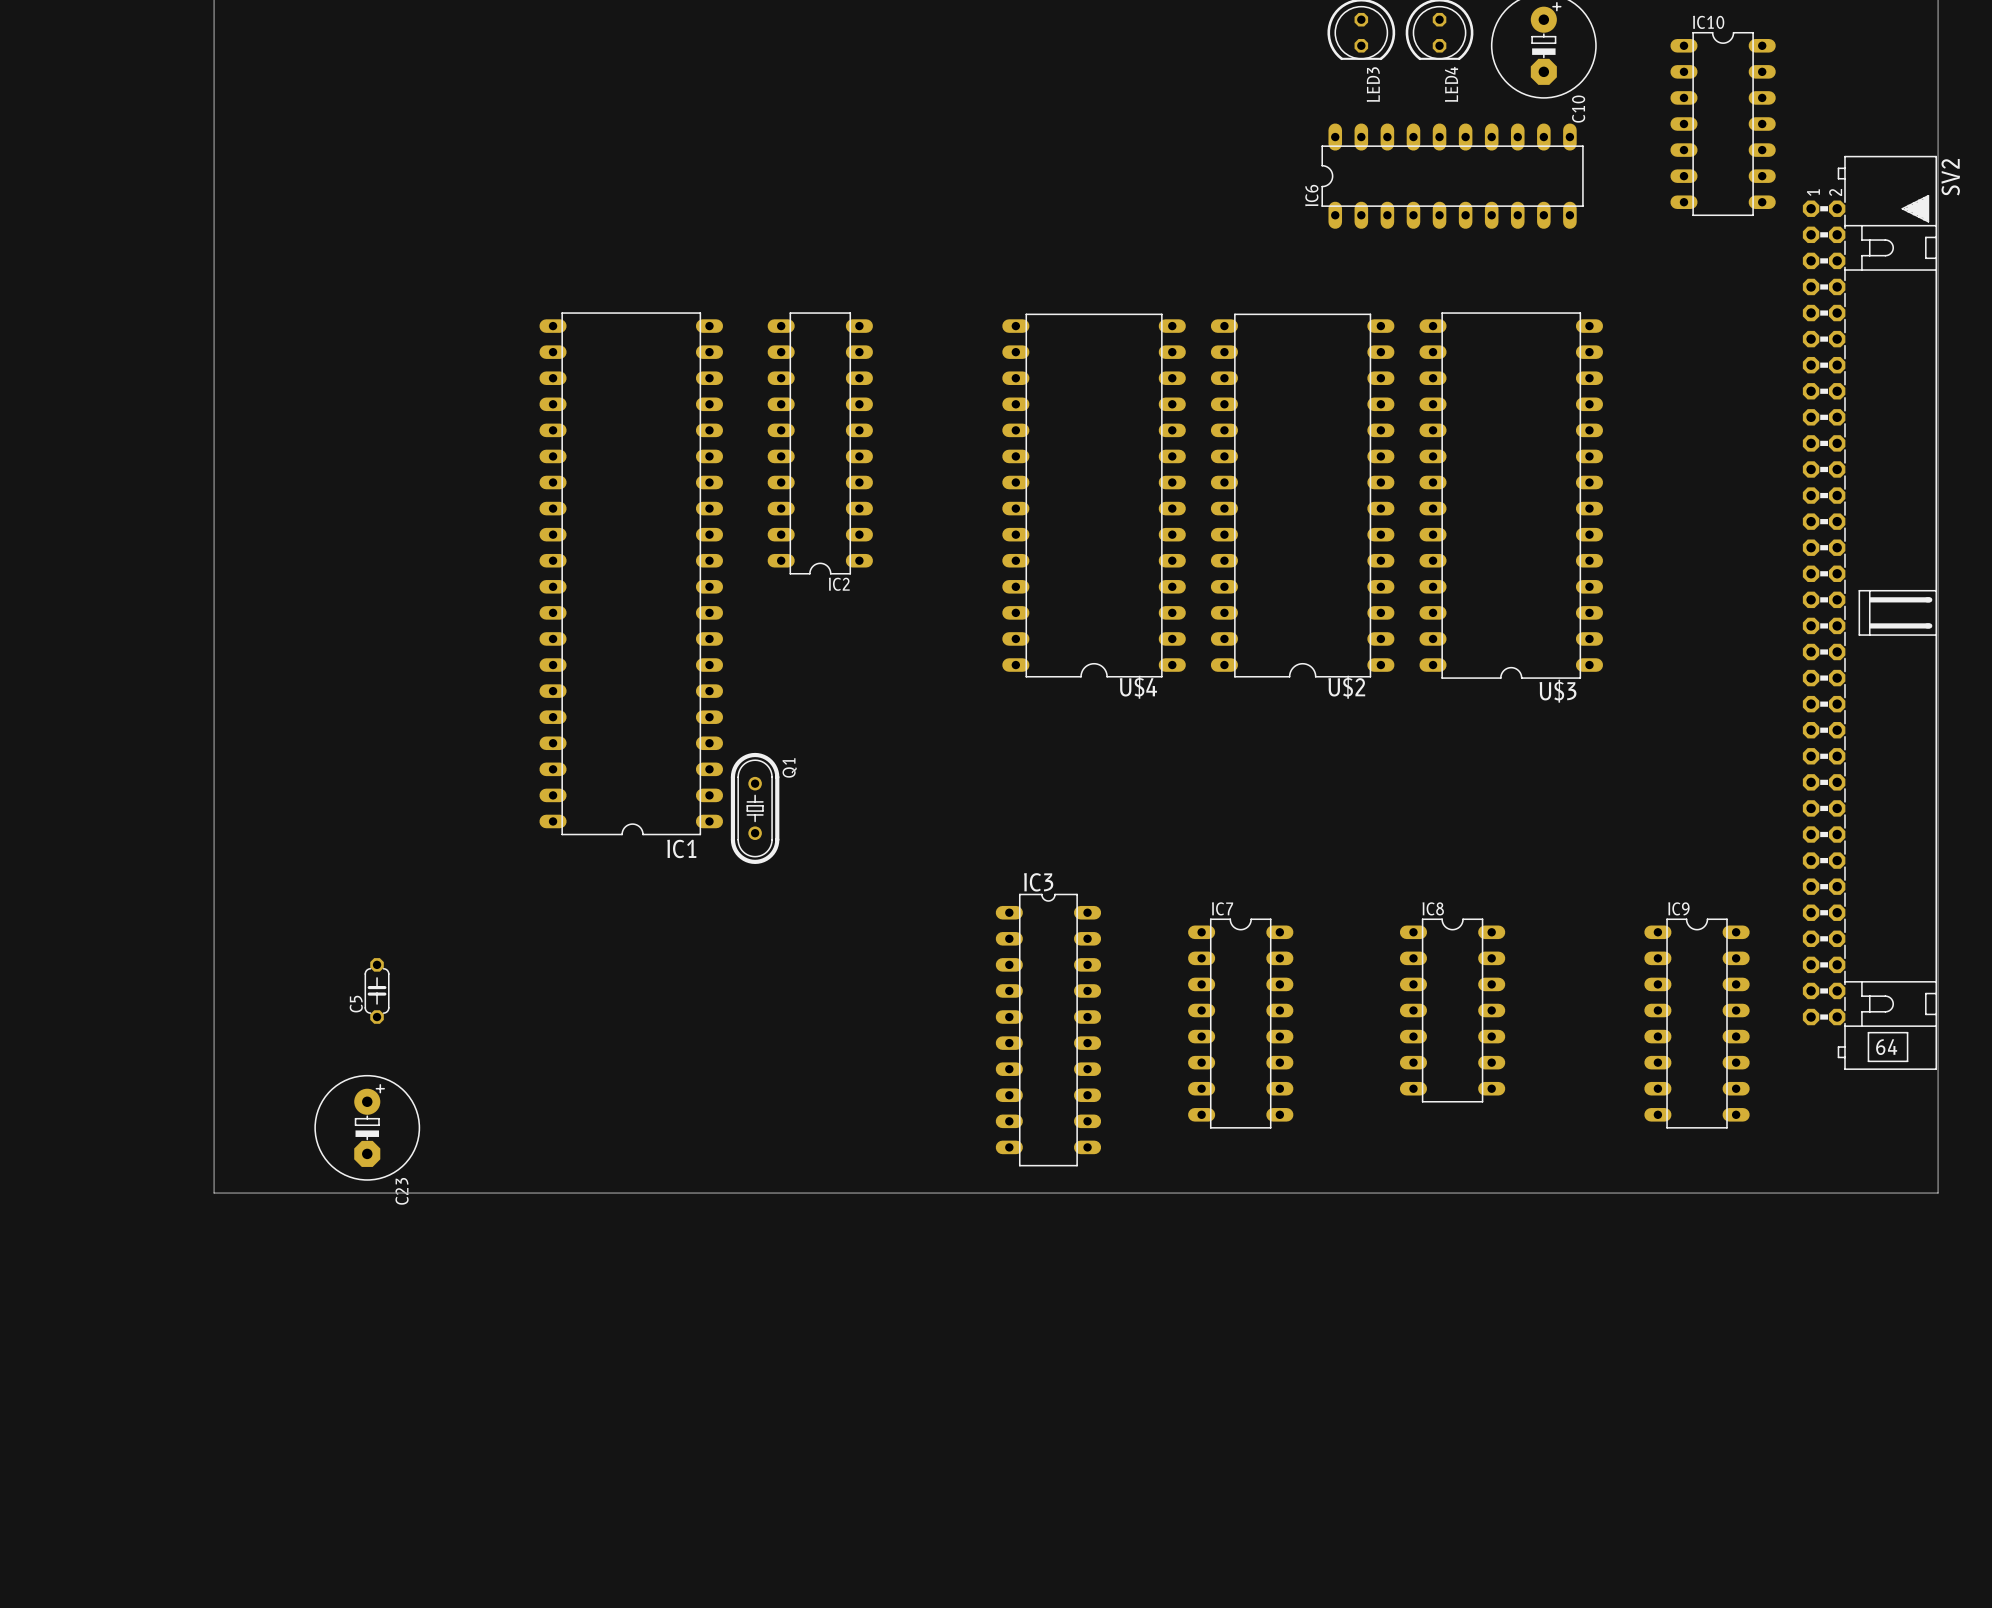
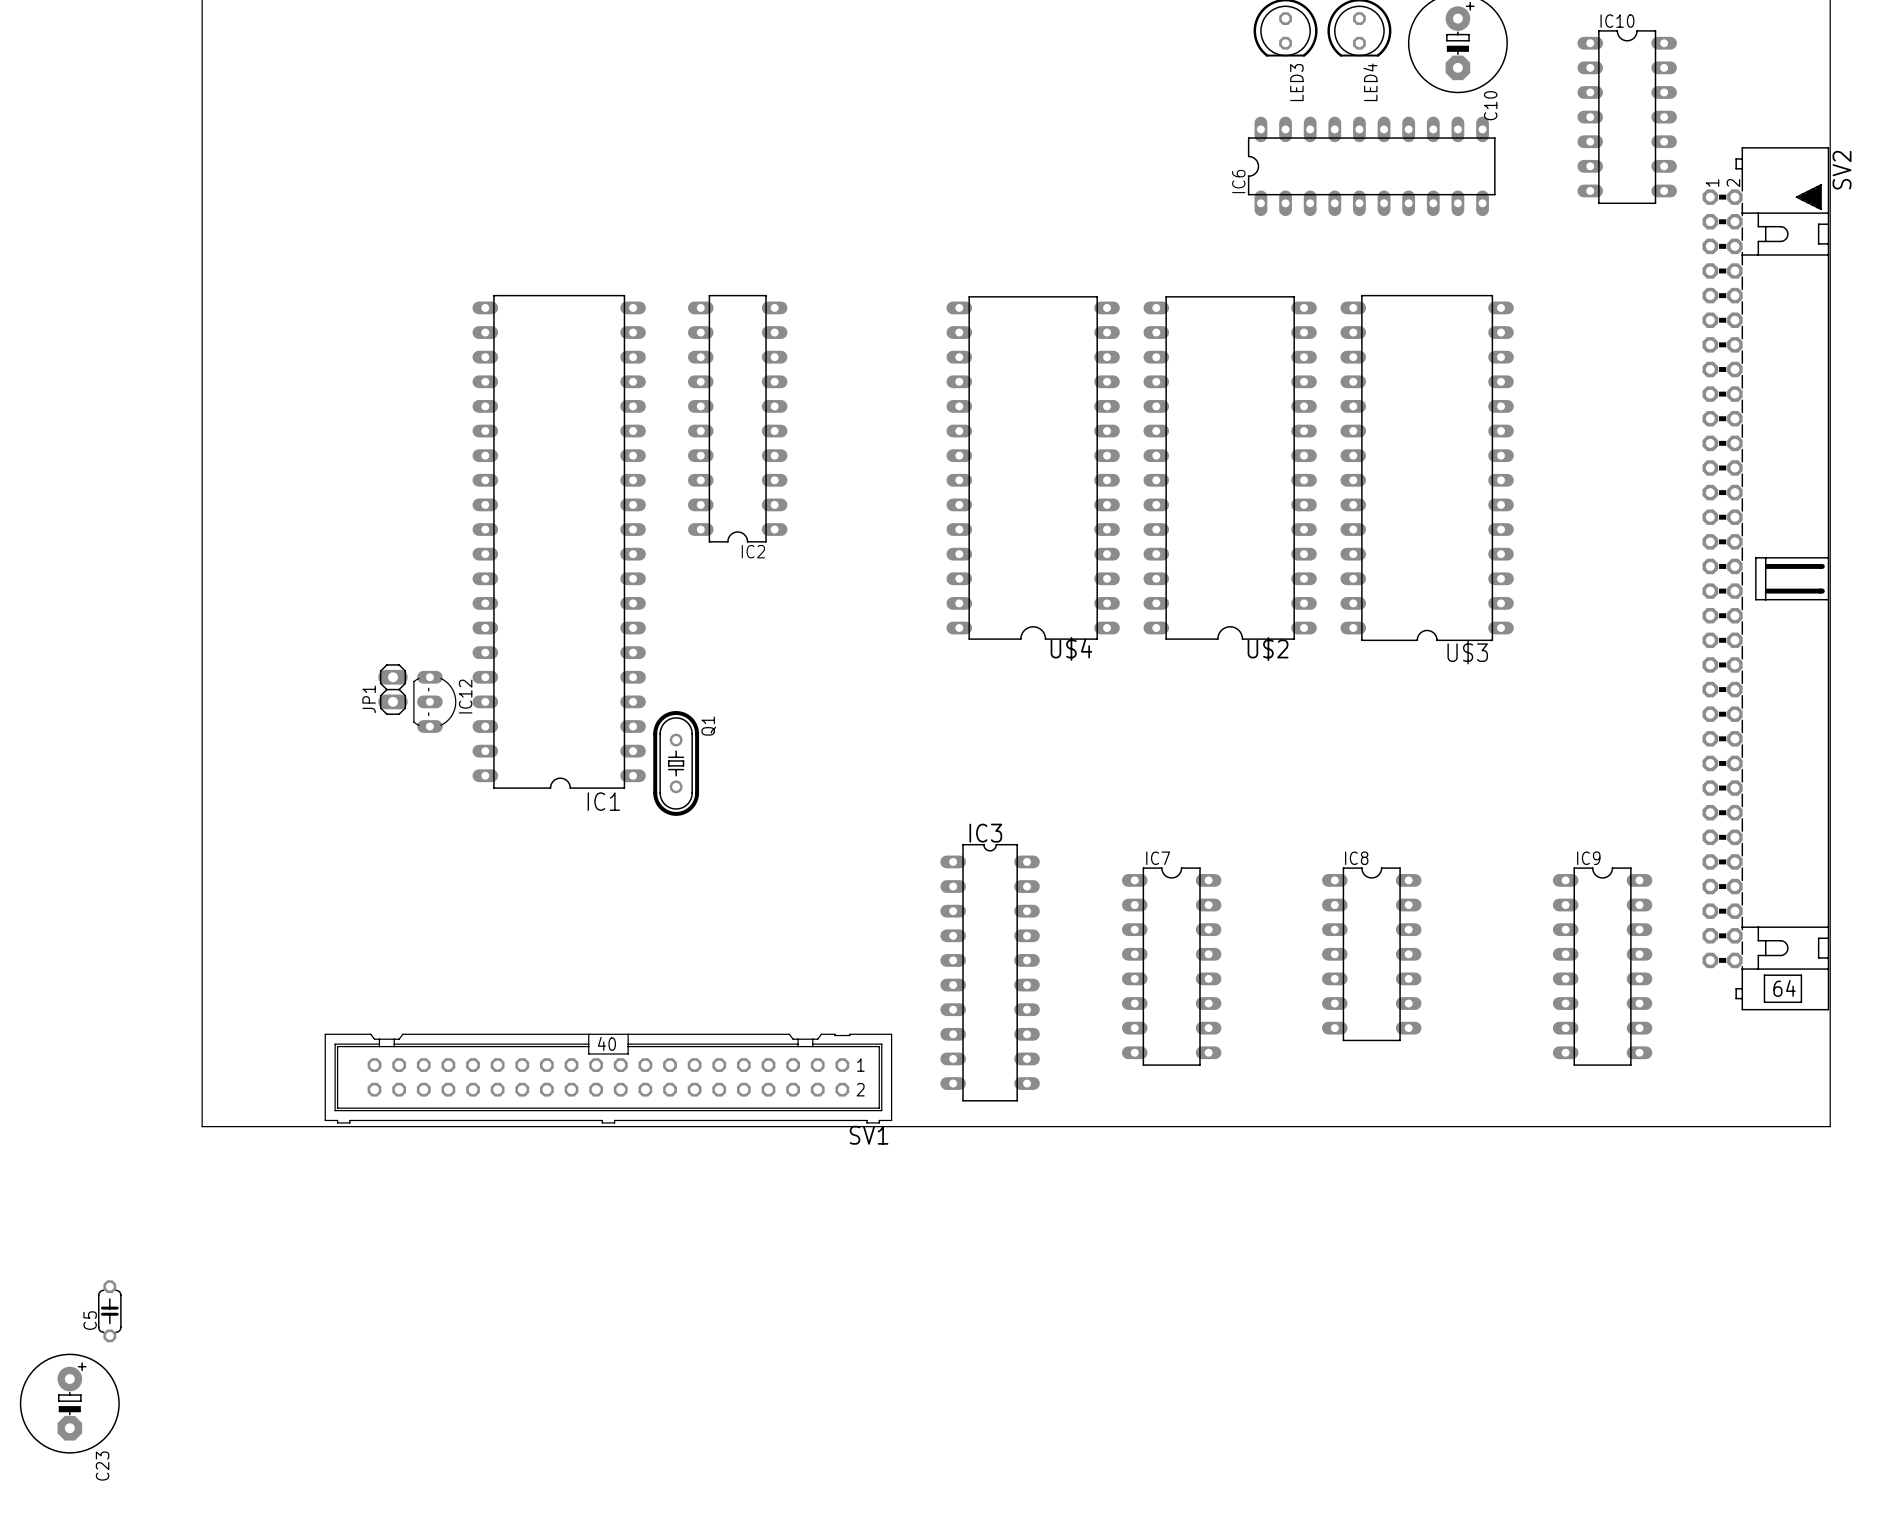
IC2 position: (820, 443) -> (737, 418)
IC1 position: (631, 573) -> (559, 541)
JP1: none -> (392, 689)
IC12: none -> (434, 701)
Q1 position: (755, 808) -> (676, 763)
C5 position: (377, 990) -> (109, 1311)
C23 position: (367, 1127) -> (69, 1403)
SV1: none -> (608, 1078)

